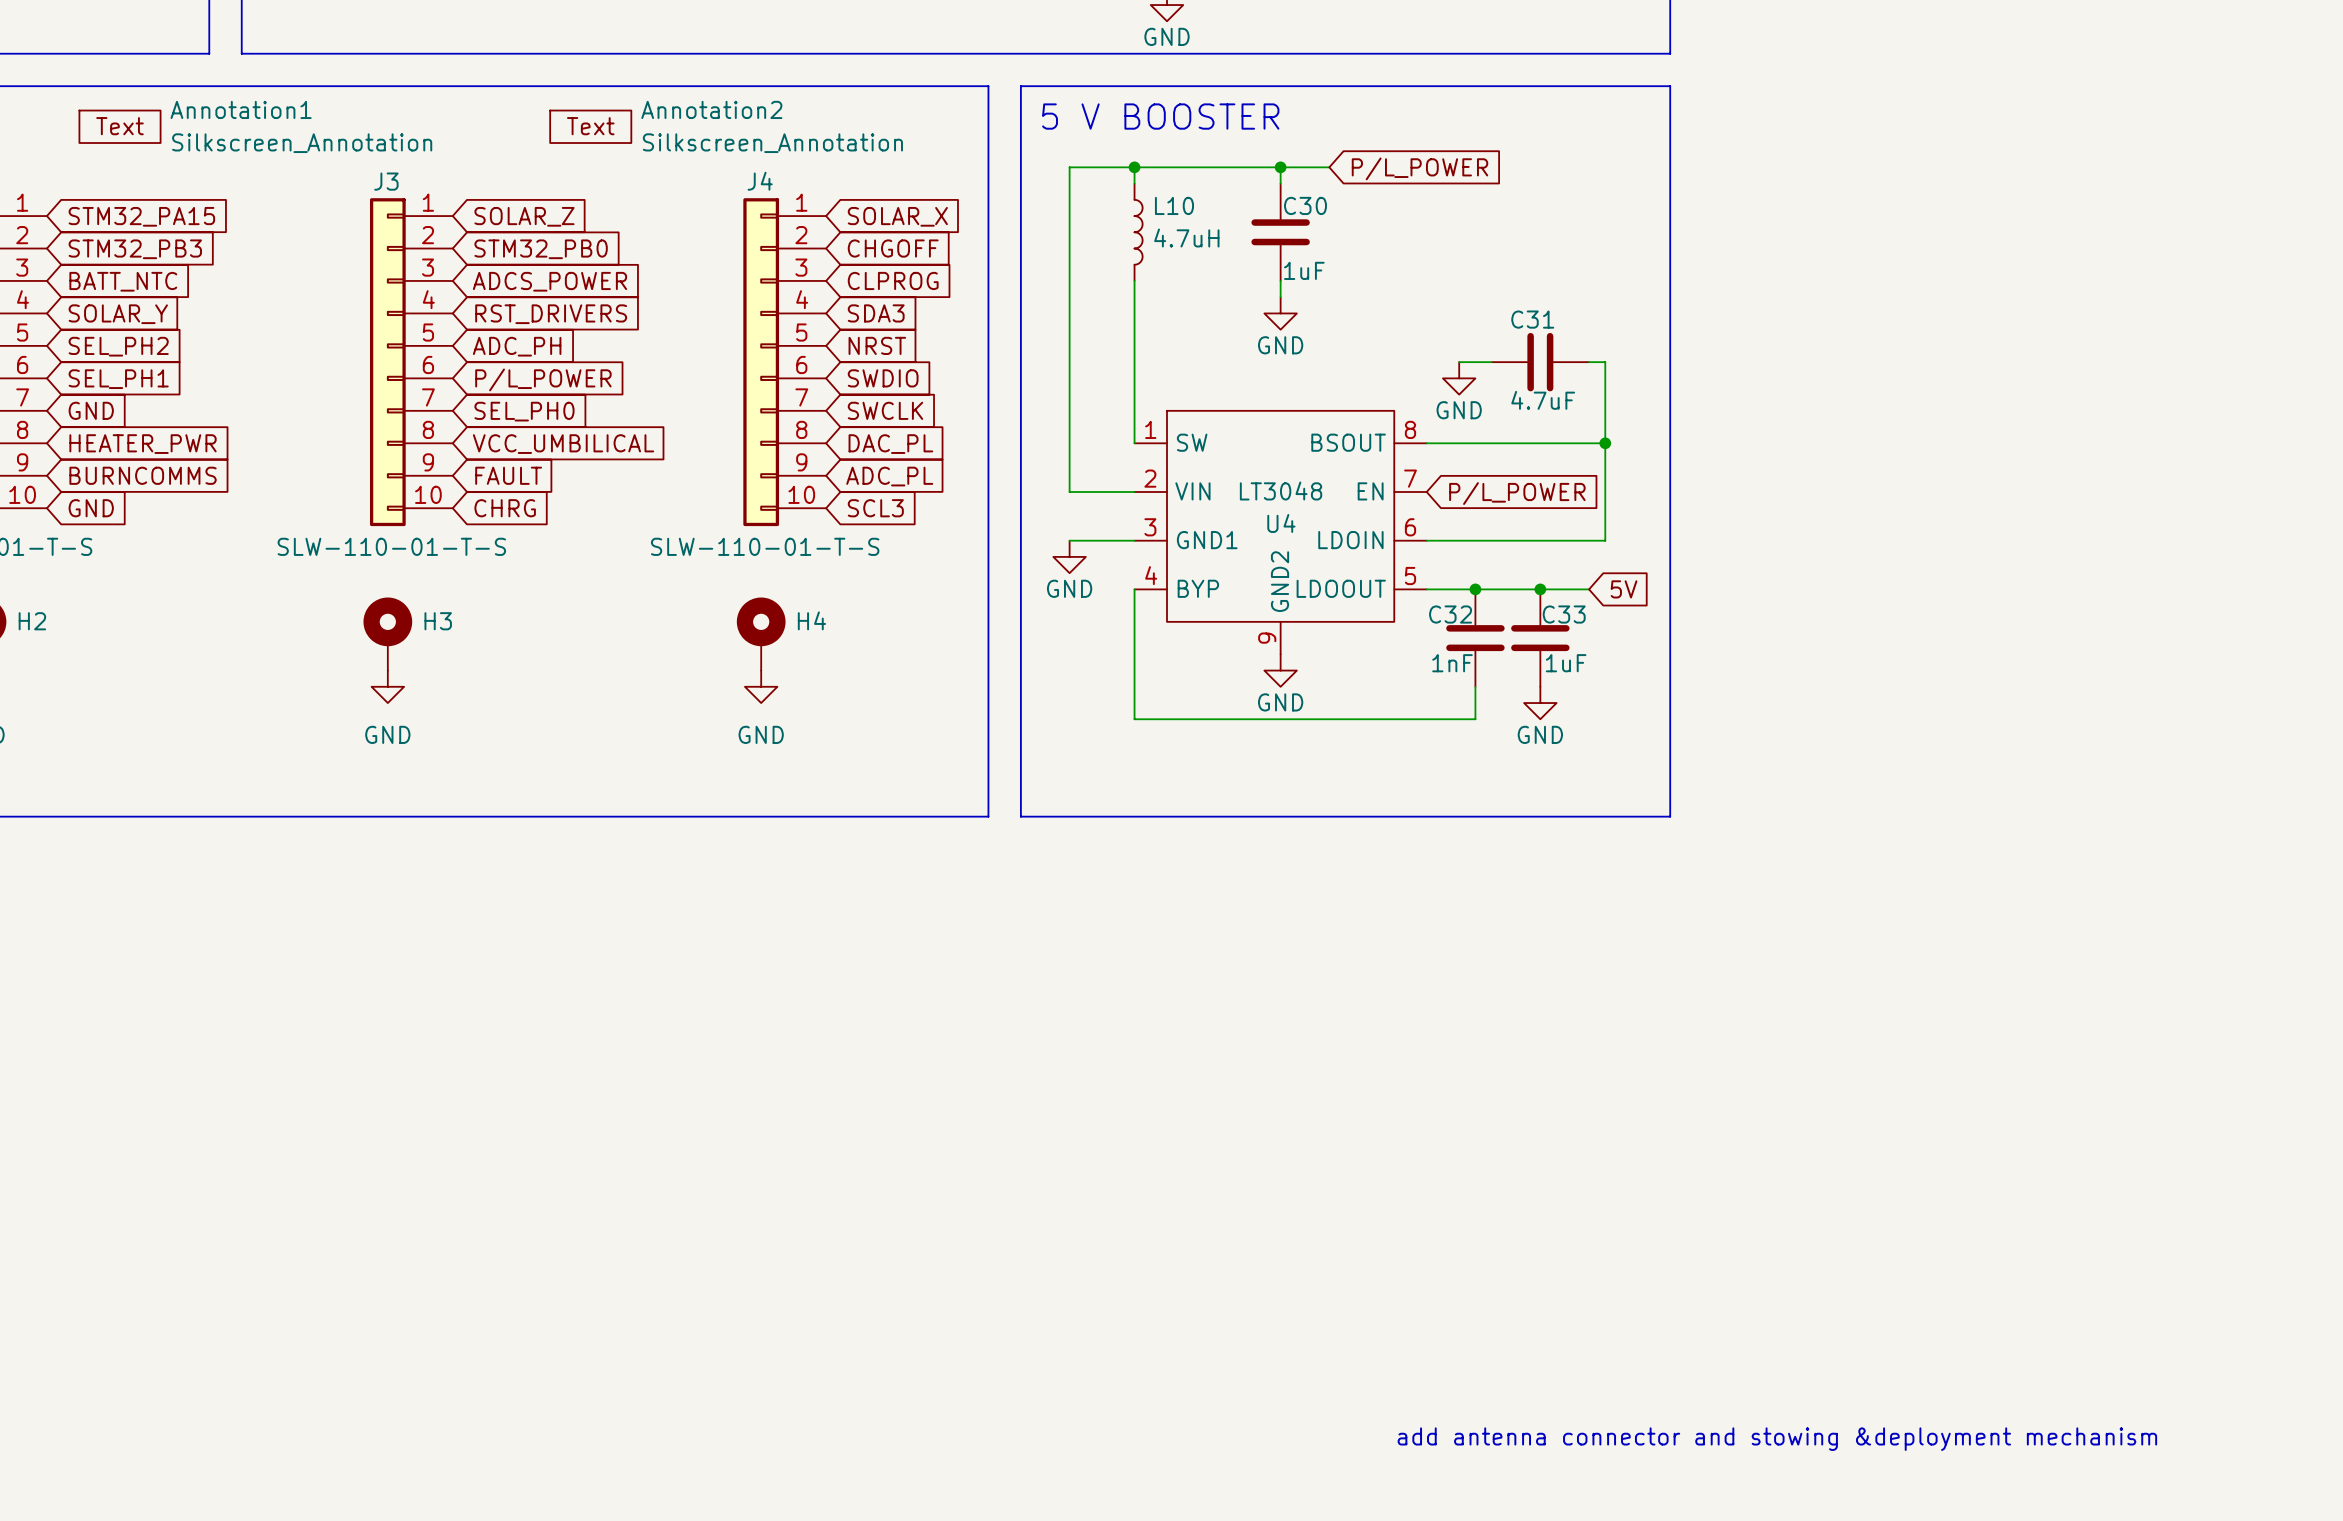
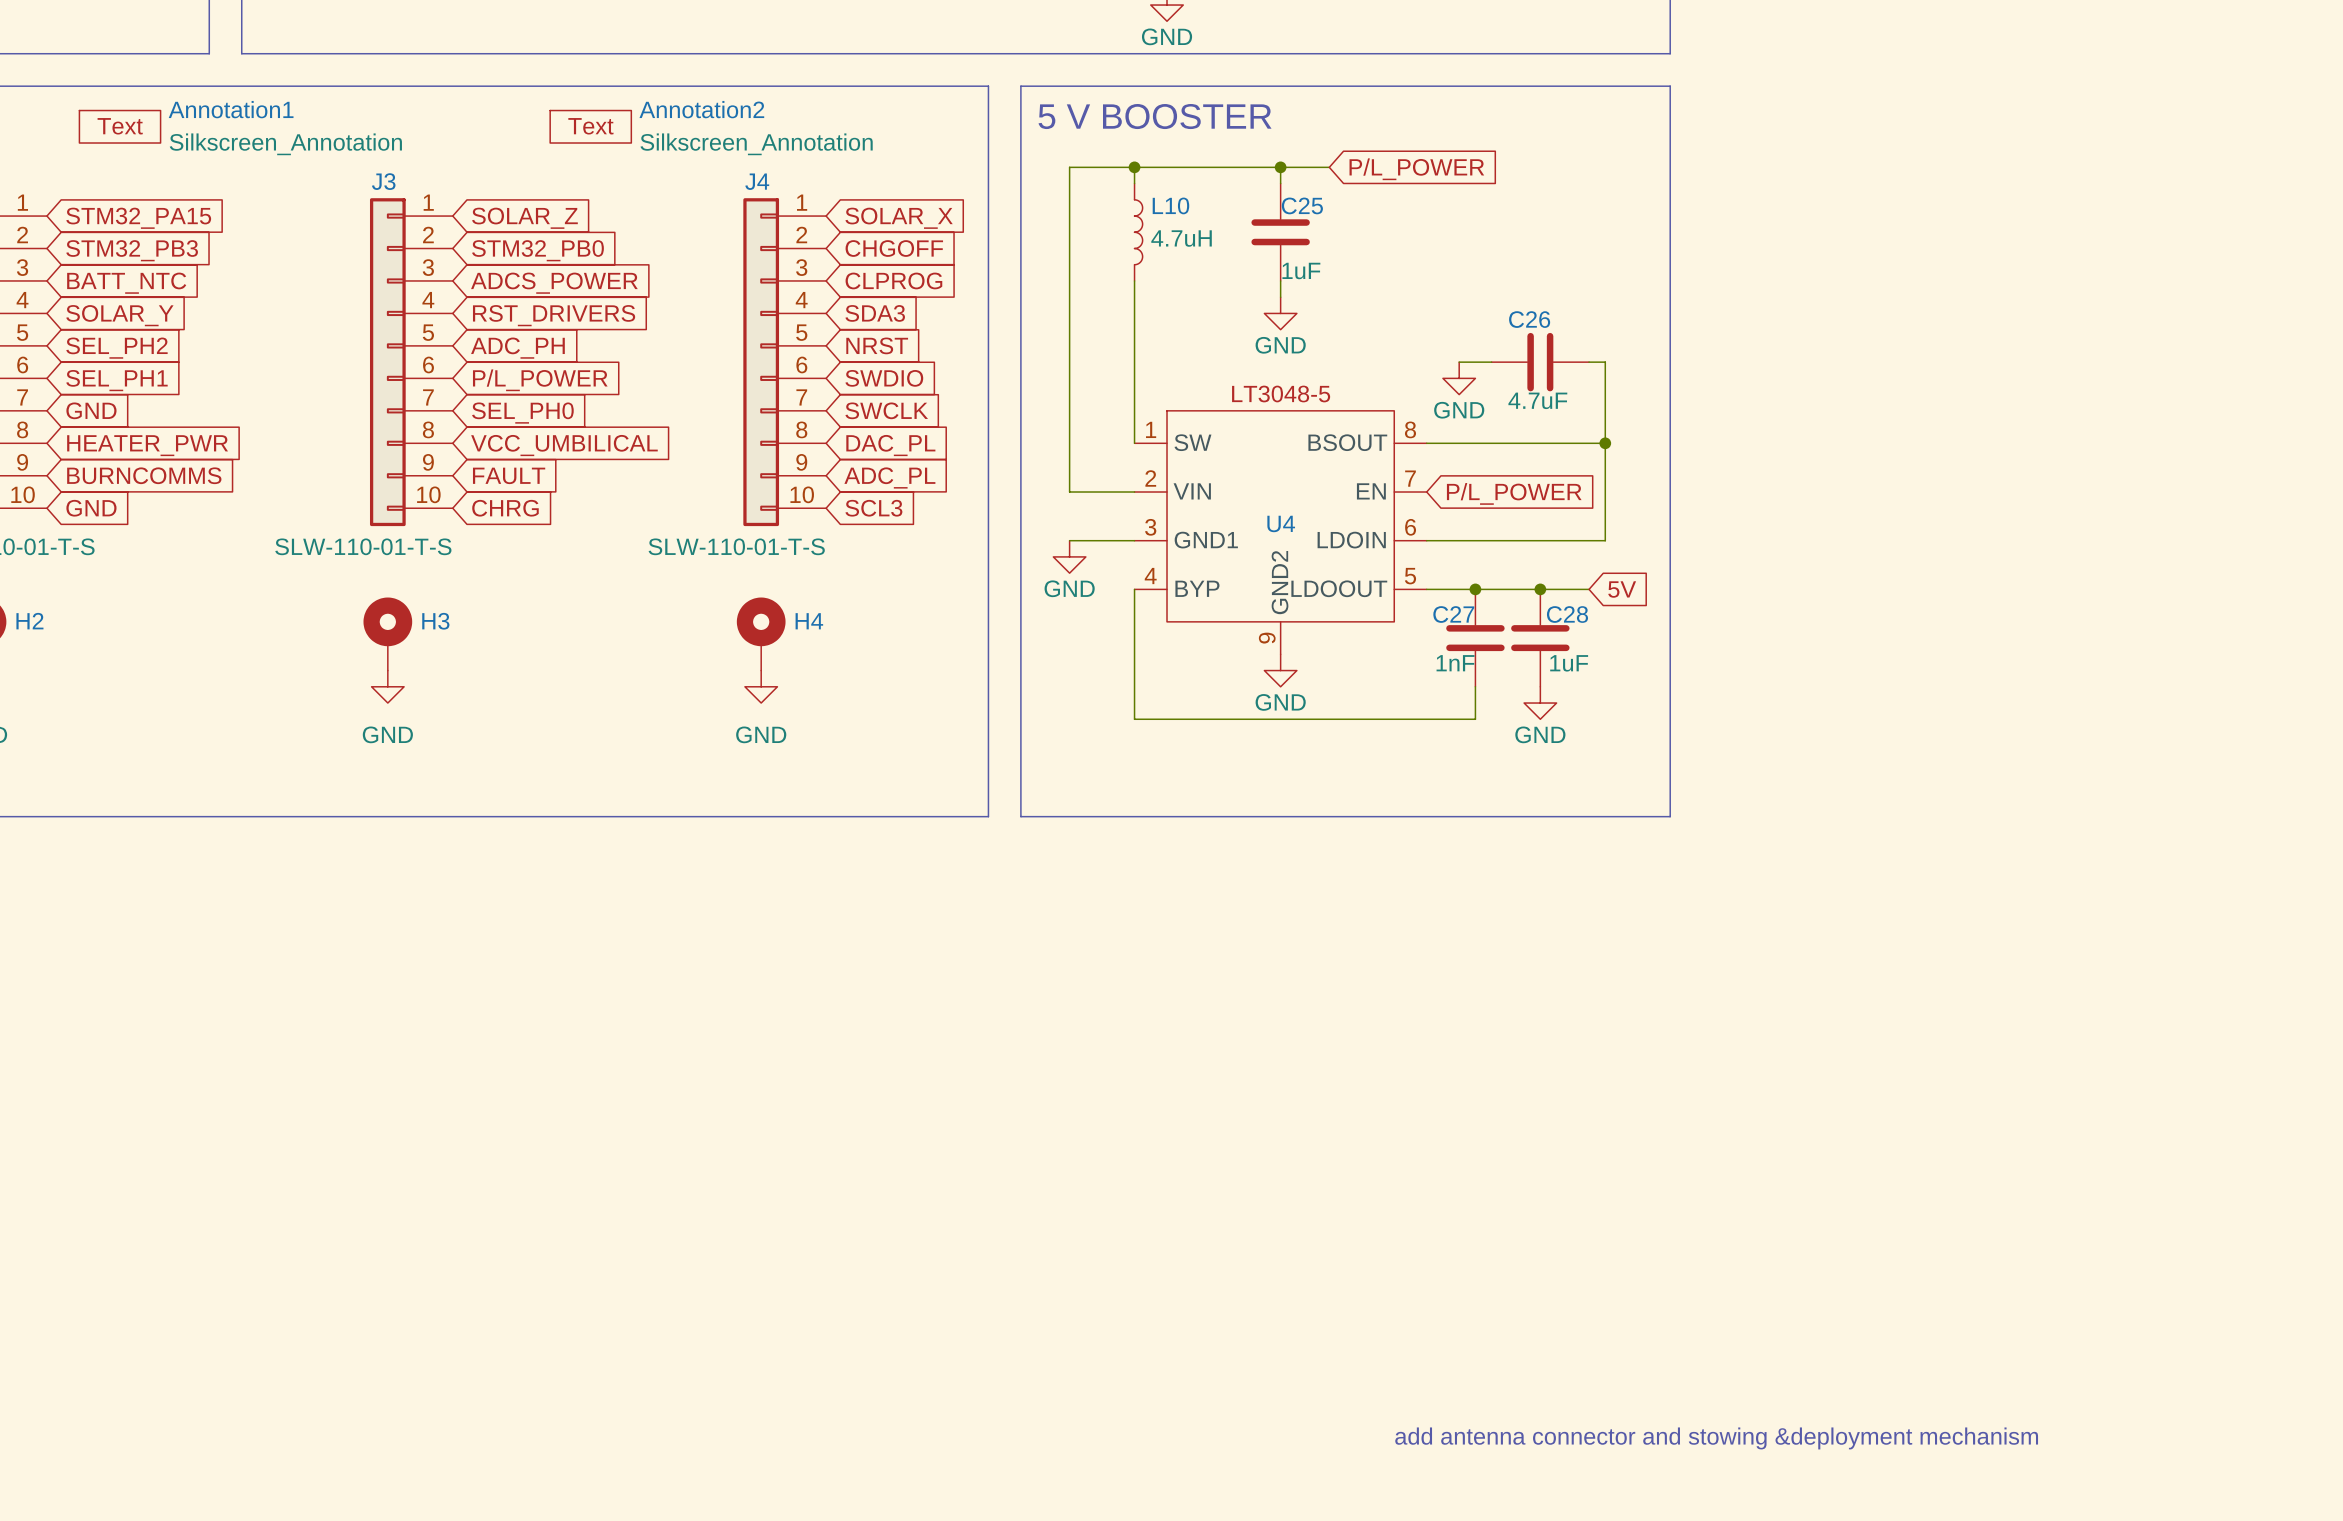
C30 name: C30 (1305, 205) -> C25 (1302, 205)
C31 name: C31 (1532, 319) -> C26 (1529, 319)
U4 text: none -> LT3048-5 (1281, 393)
U4 value: LT3048 (1281, 491) -> none
C32 name: C32 (1450, 614) -> C27 (1453, 614)
C33 name: C33 (1564, 614) -> C28 (1567, 614)

